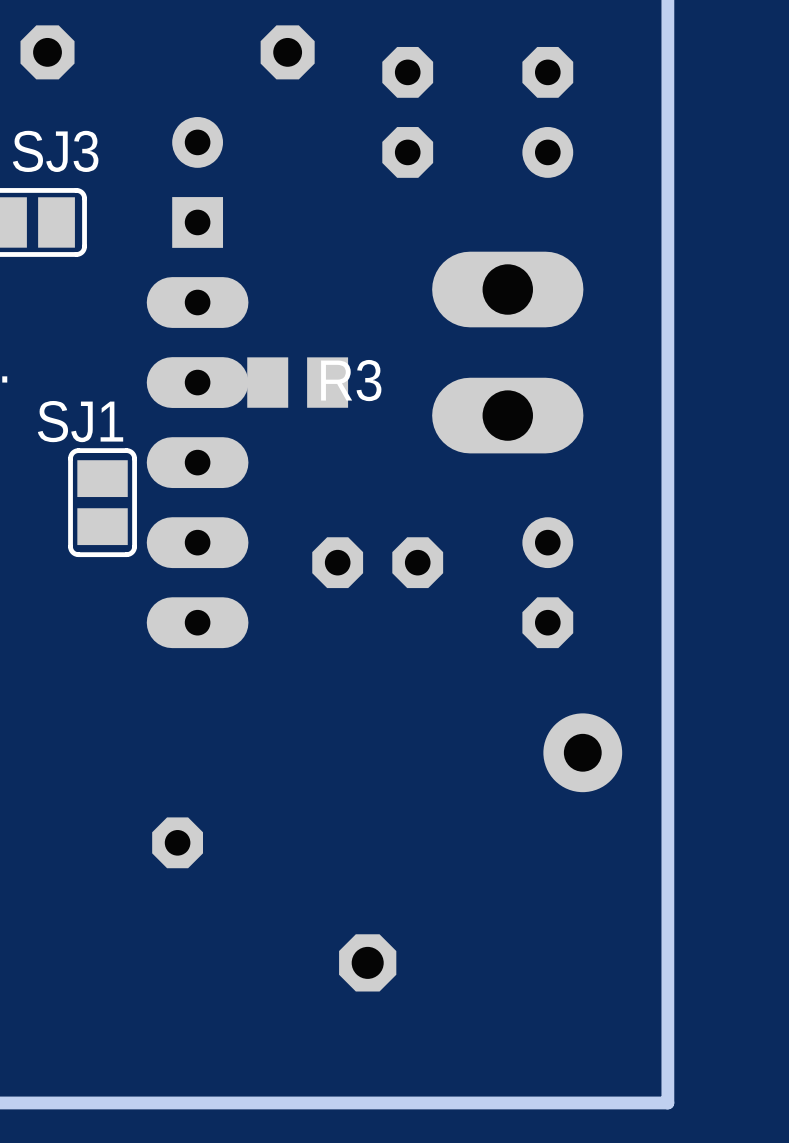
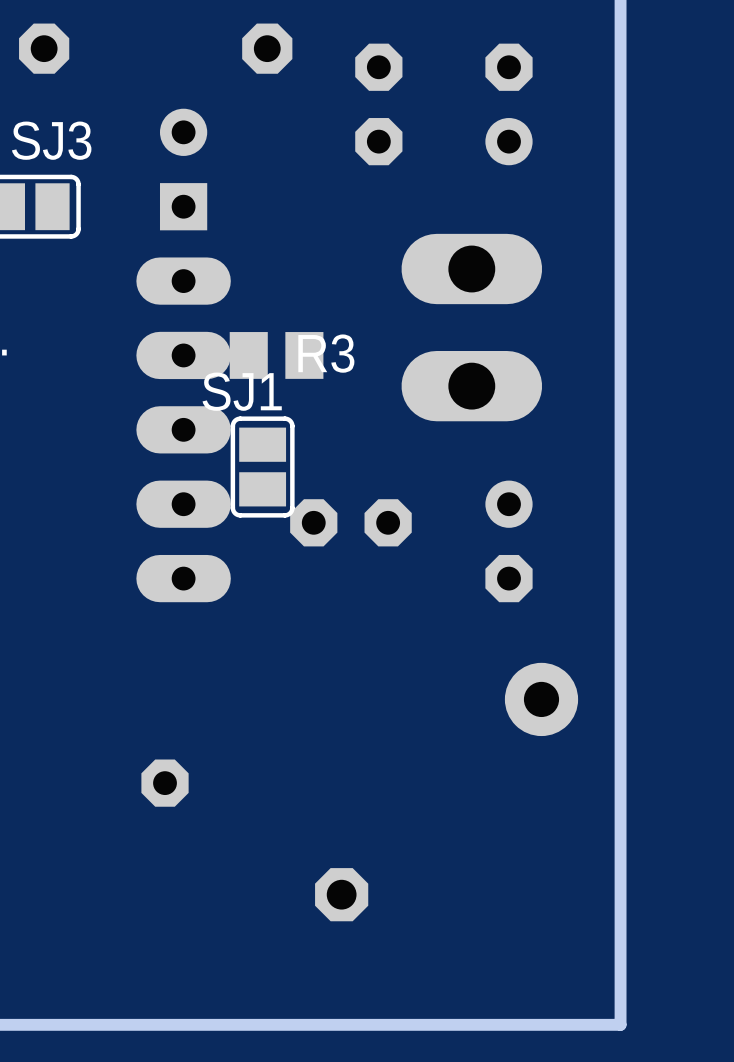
SJ1 position: (102, 502) -> (262, 467)

